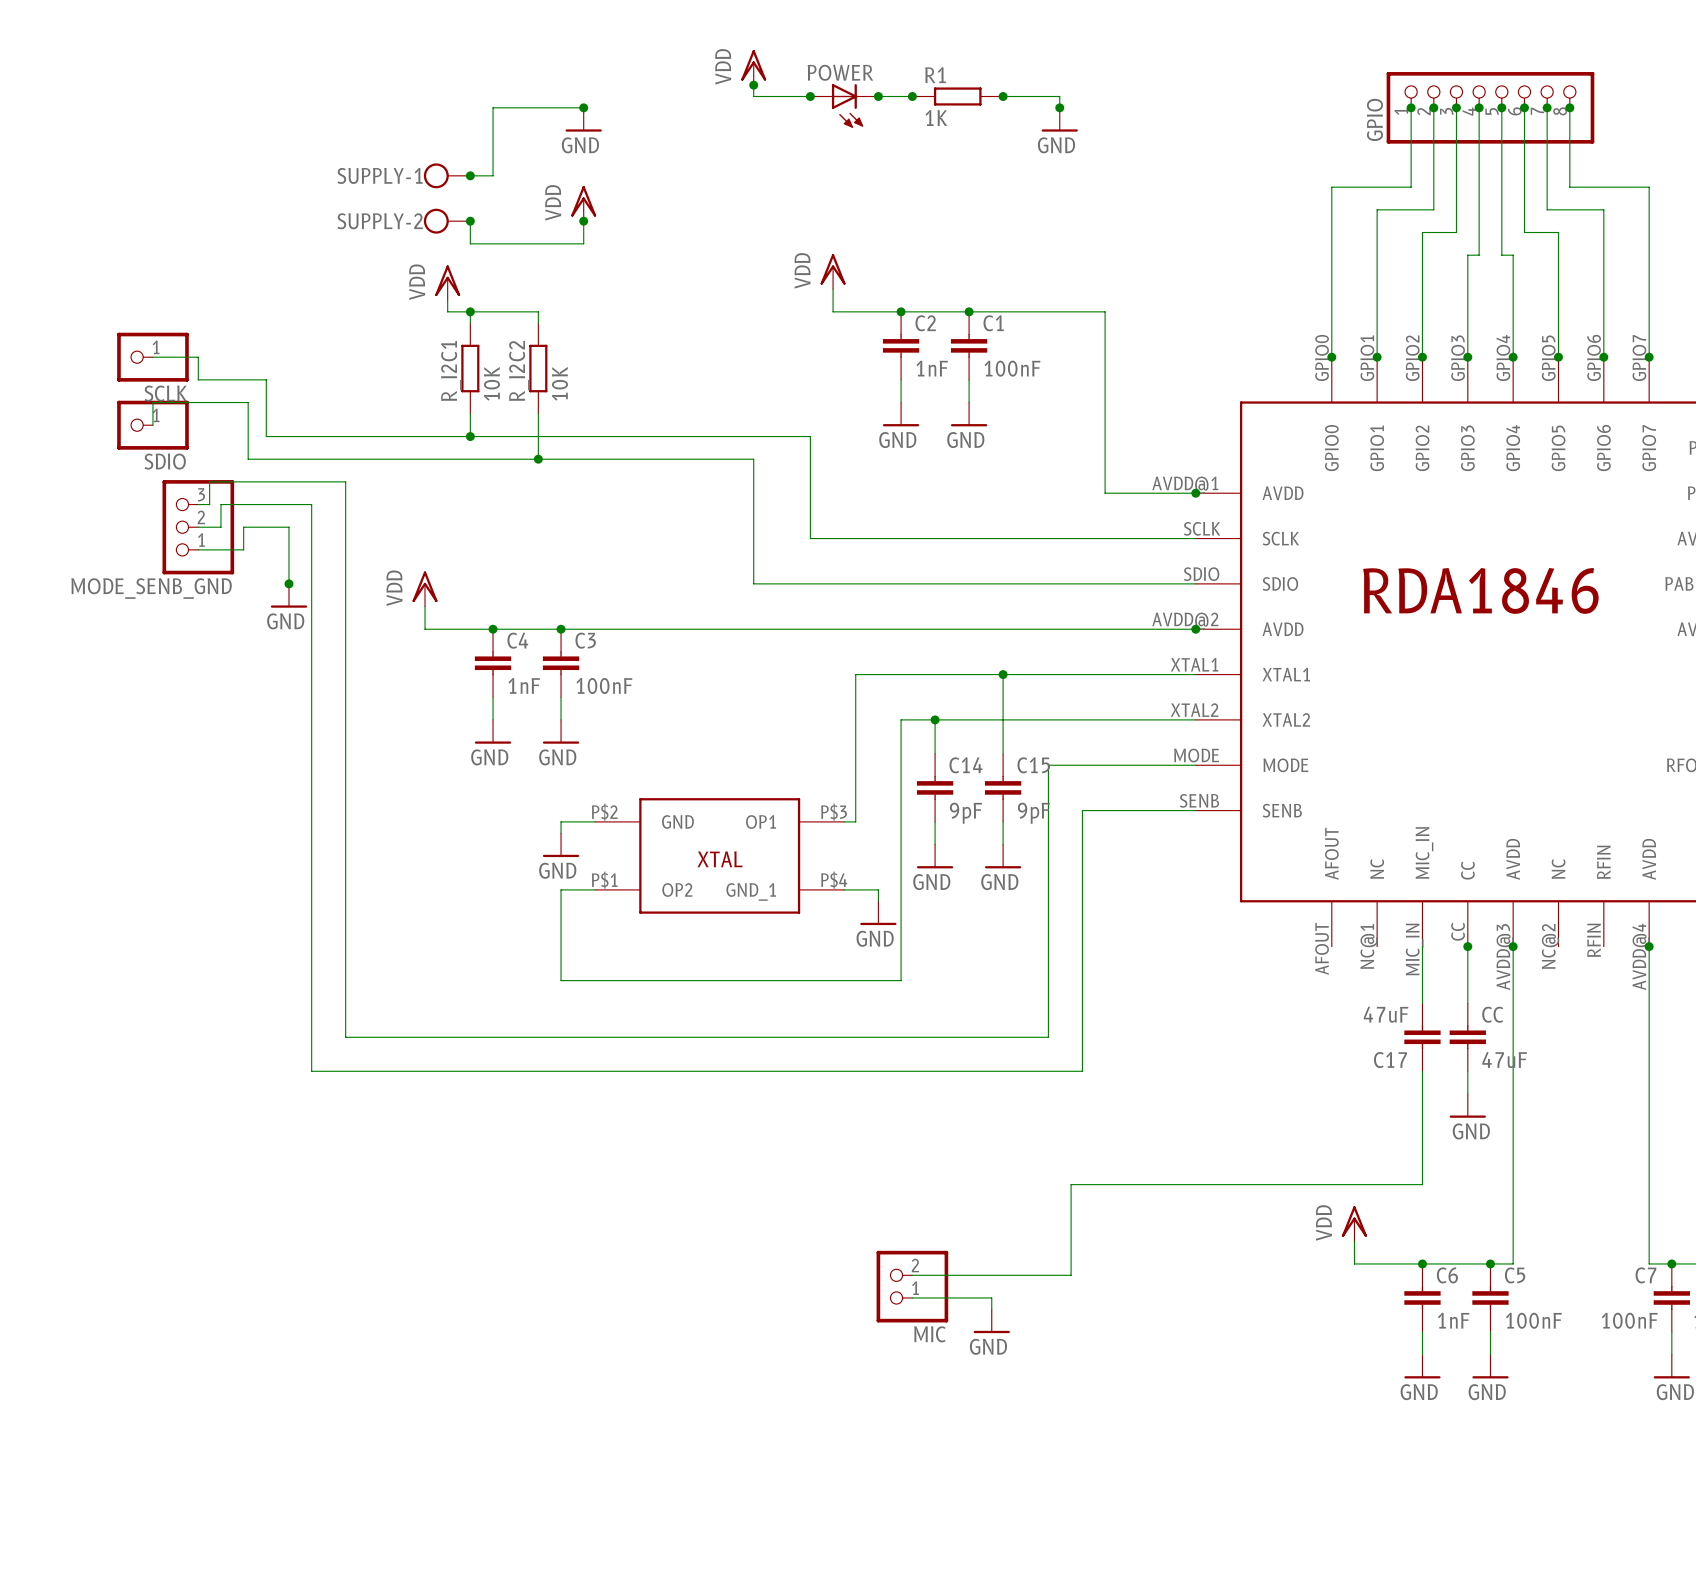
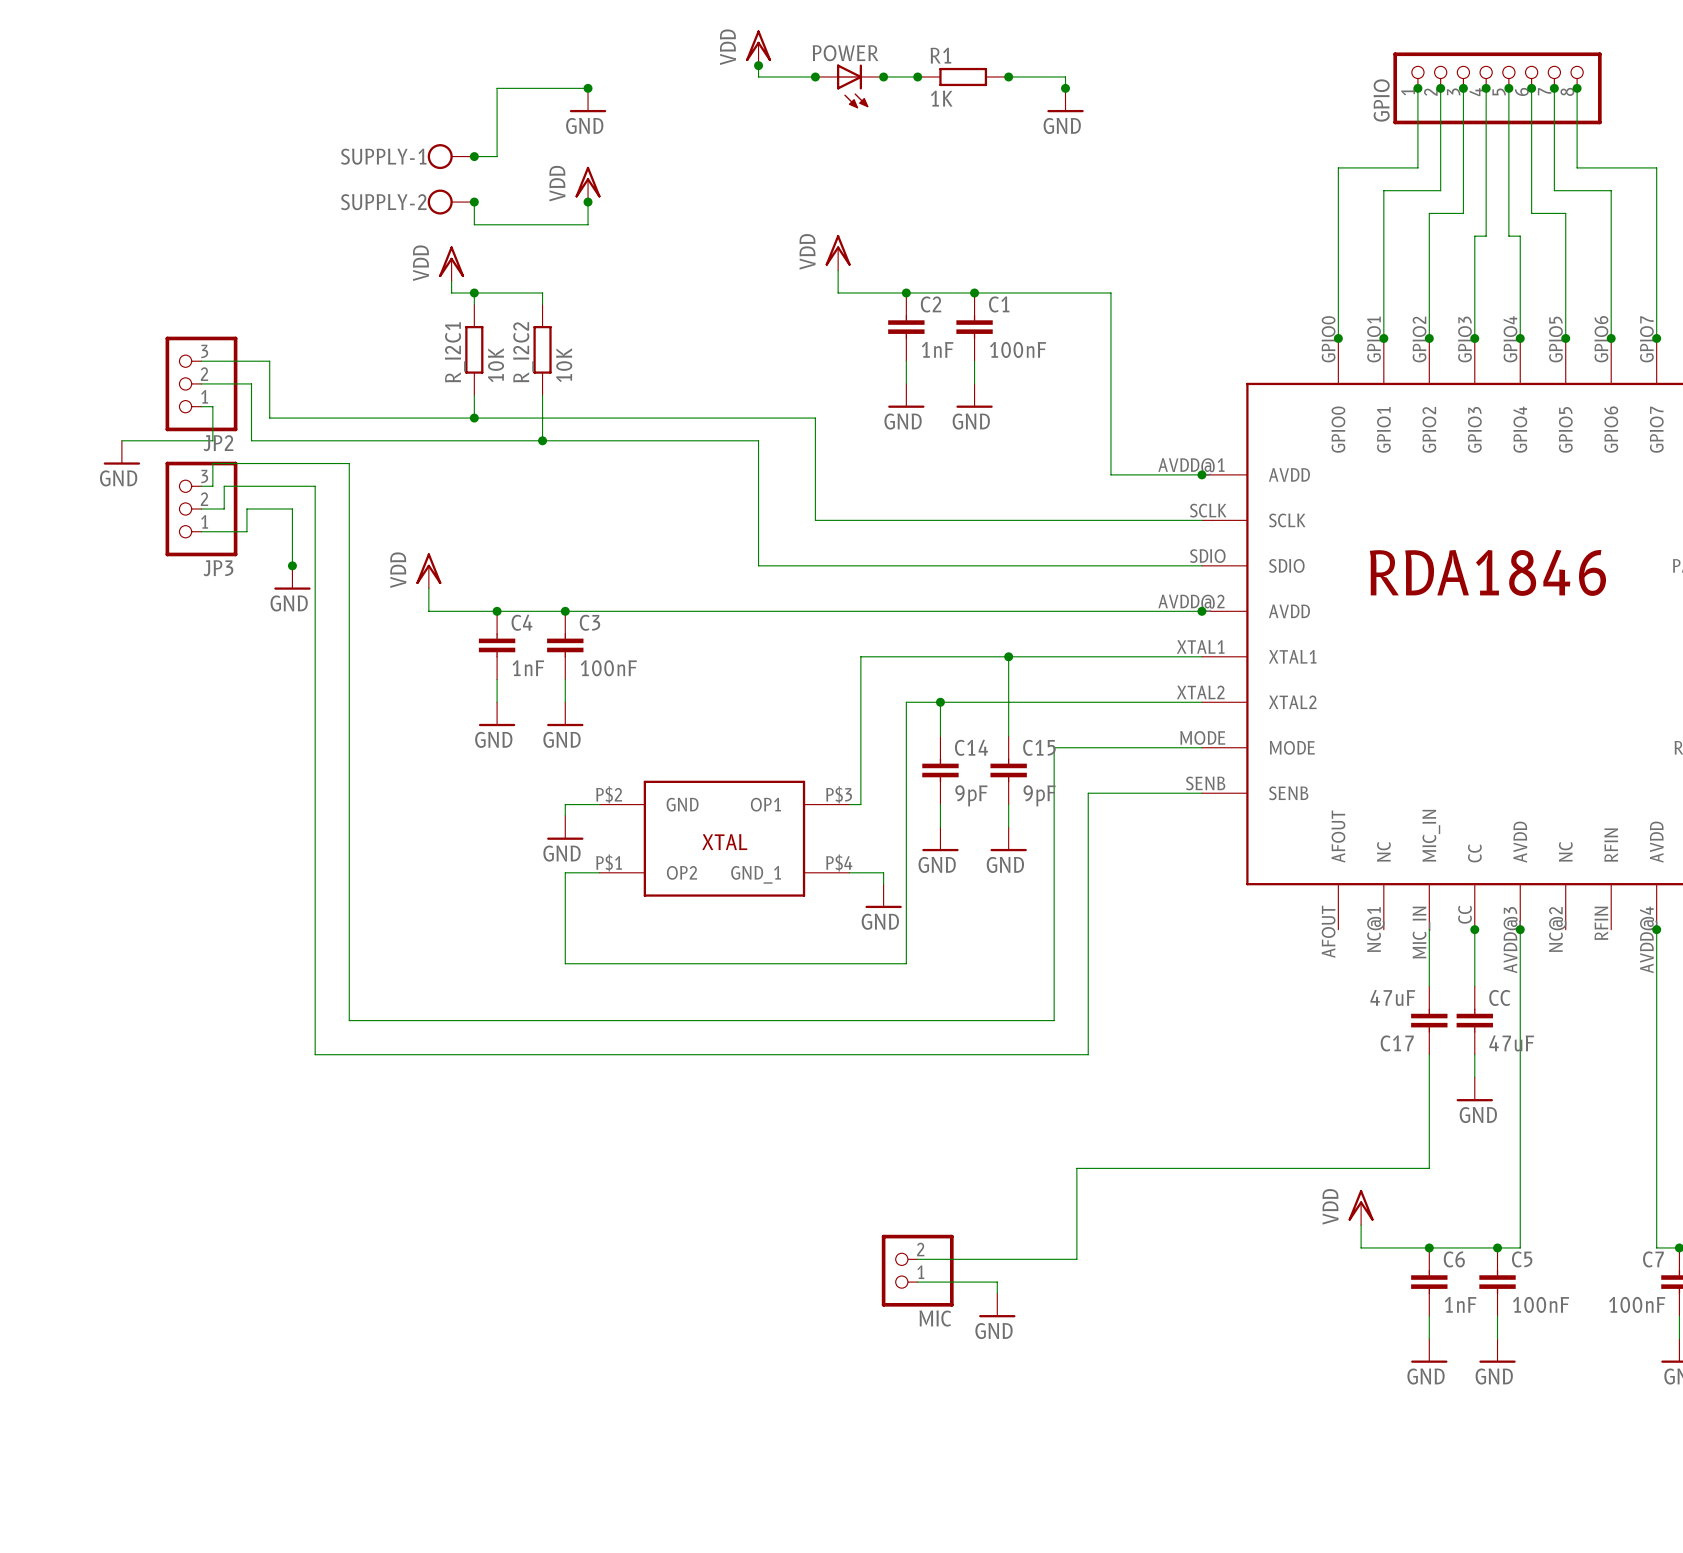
SCLK: (152, 357) -> none
wire: (198, 402) (152, 402) (152, 425) -> none
JP2: none -> (201, 383)
SDIO: (152, 425) -> none
wire: none -> (201, 406) (212, 406) (212, 440) (121, 440)
power symbol: none -> GND (121, 452)
MODE_SENB_GND name: MODE_SENB_GND (151, 588) -> JP3 (218, 568)

